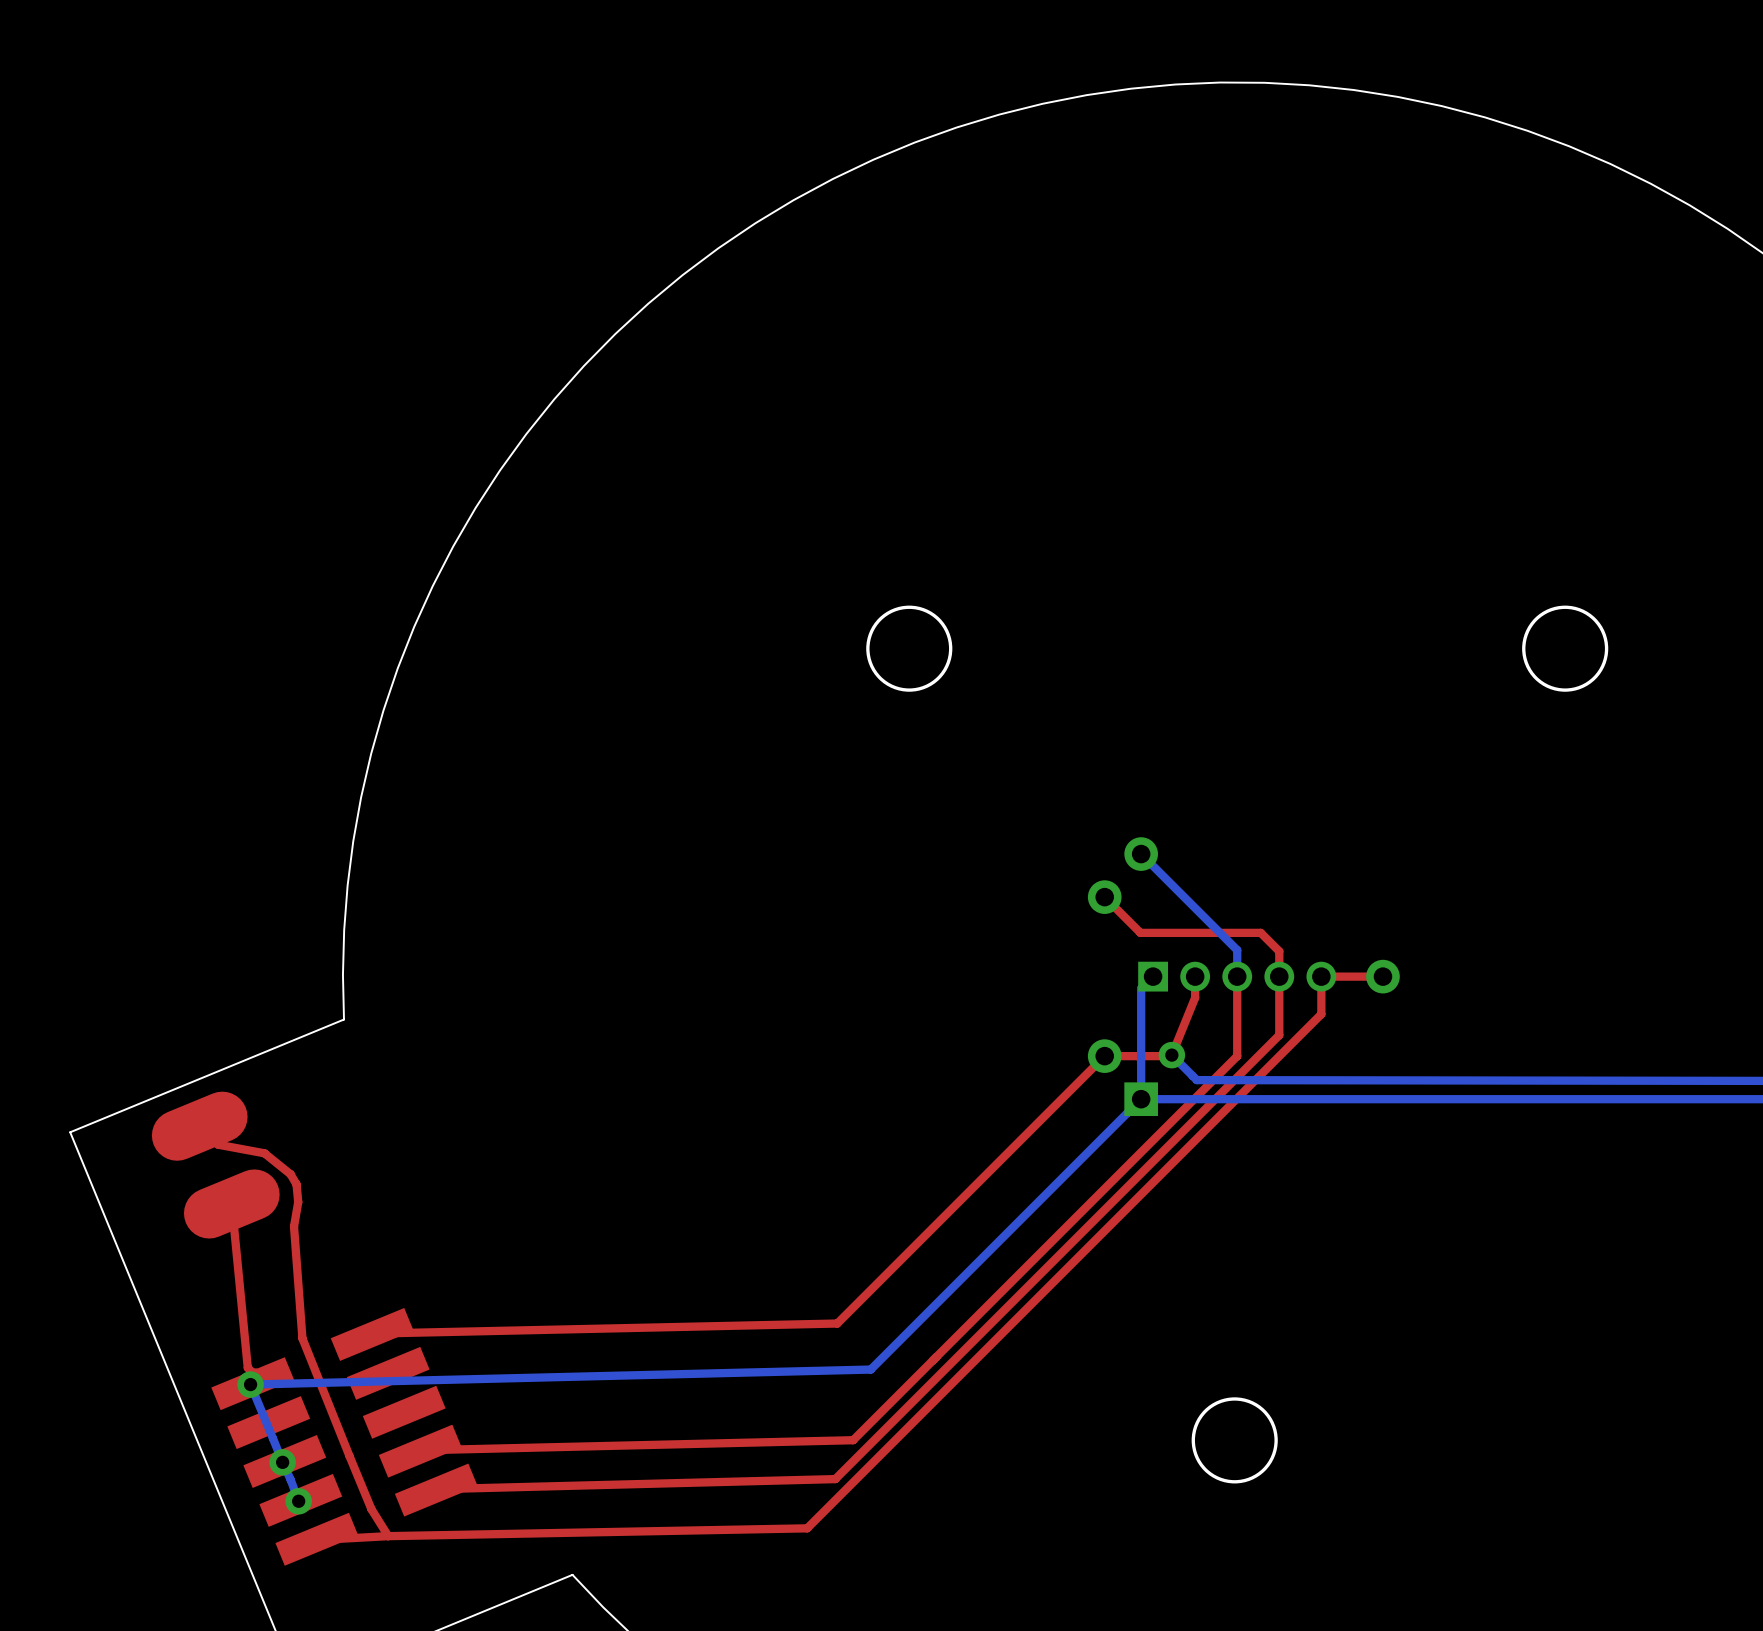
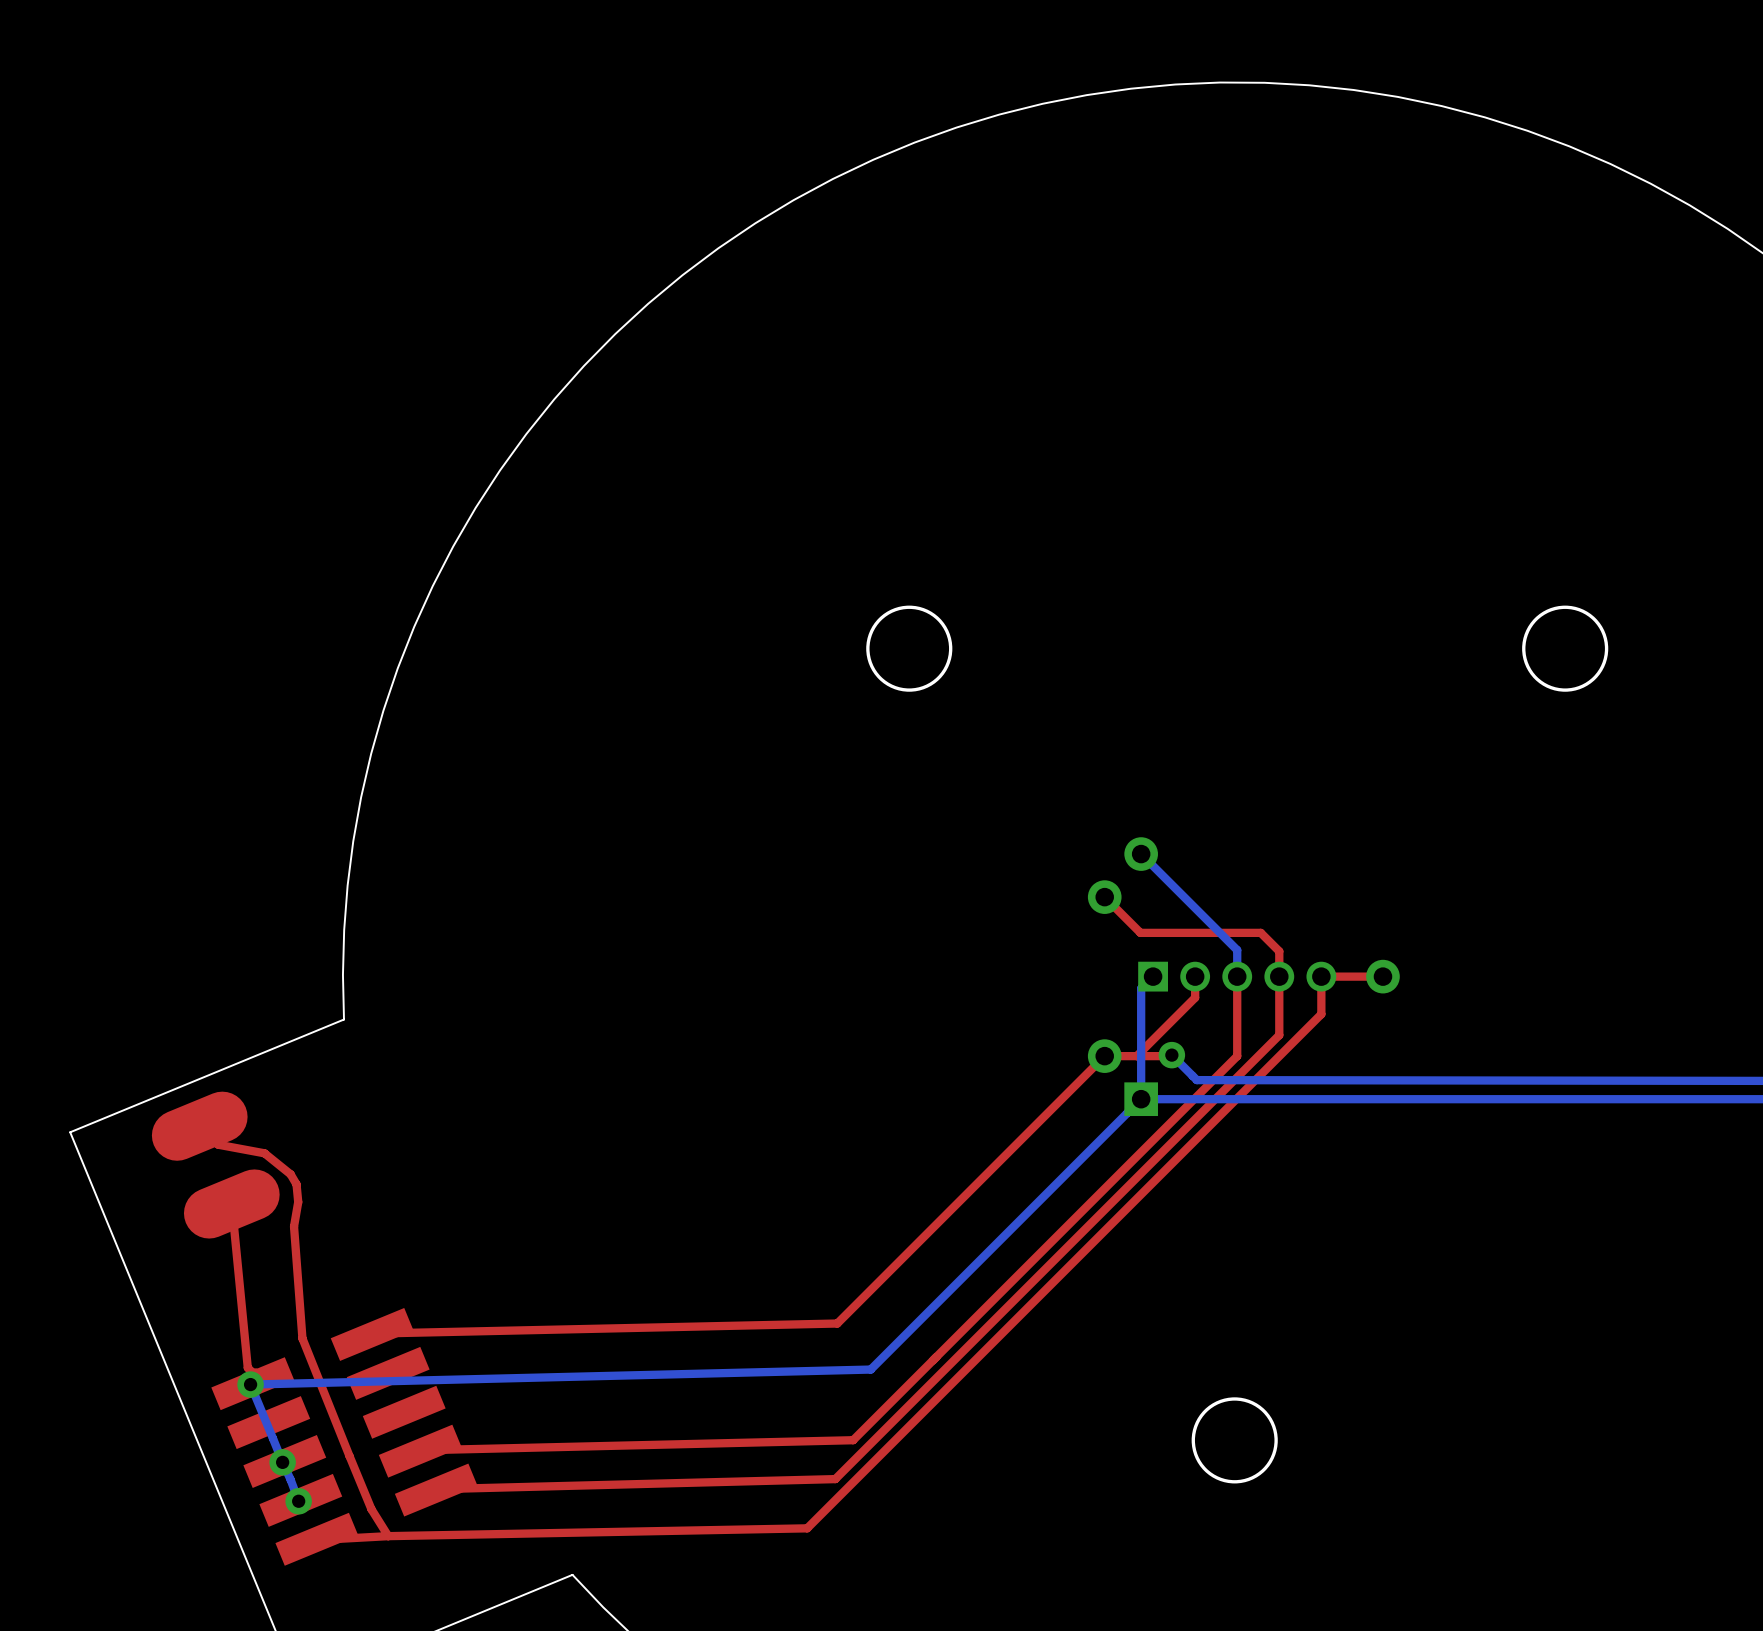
top track: (1195, 997) (1171, 1055) -> (1195, 997) (1136, 1056)

